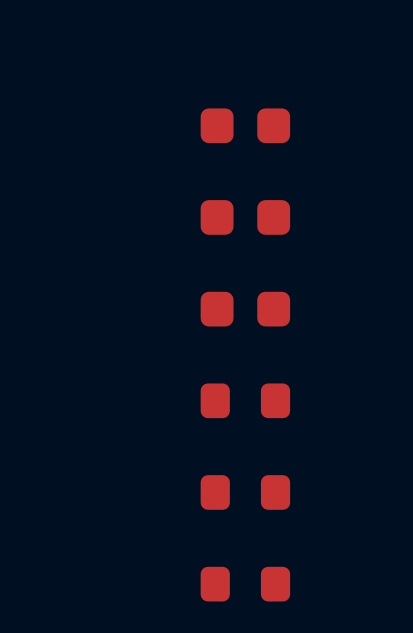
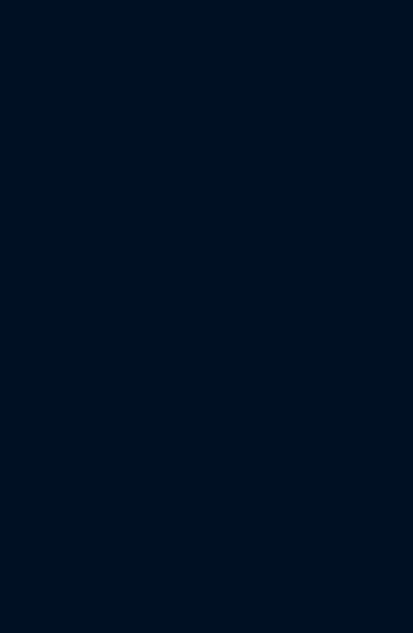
part: (245, 125) -> none
part: (245, 217) -> none
part: (245, 309) -> none
part: (245, 400) -> none
part: (245, 492) -> none
part: (245, 584) -> none

